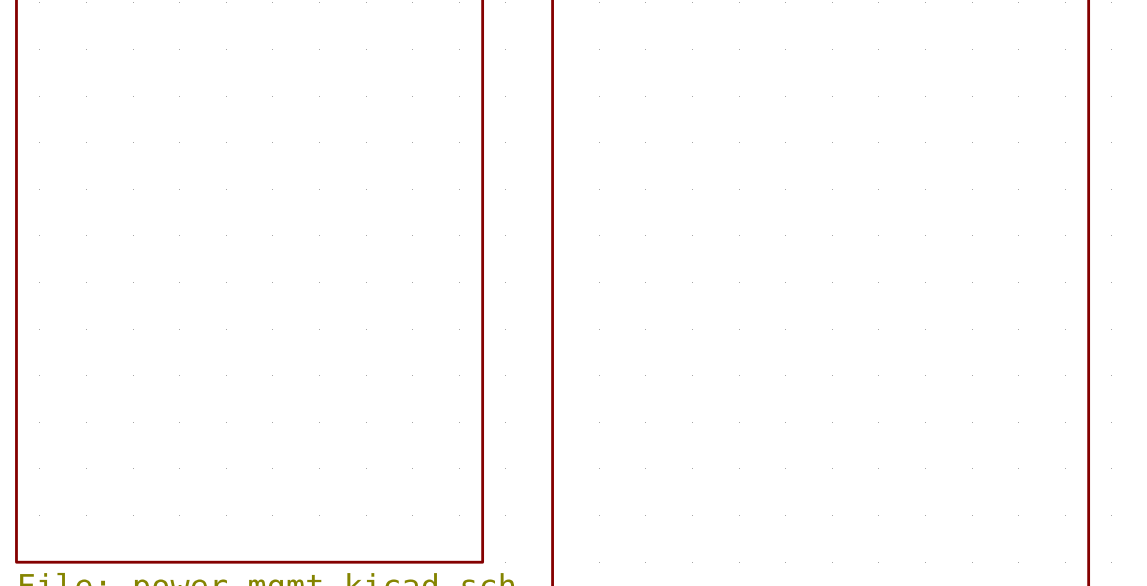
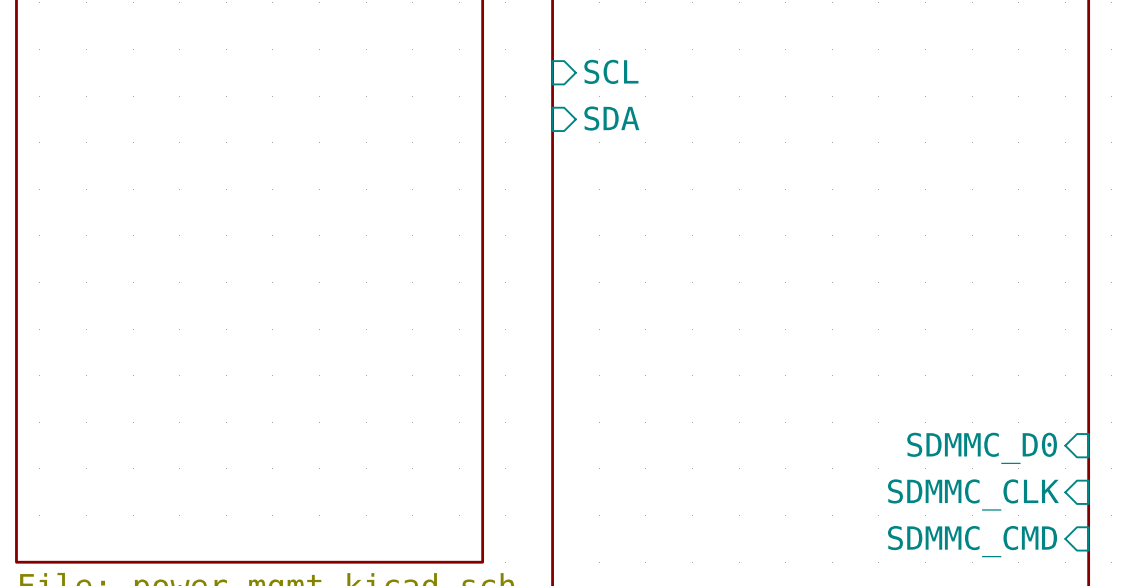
sheet pin: none -> SCL (611, 71)
sheet pin: none -> SDA (611, 118)
sheet pin: none -> SDMMC_D0 (982, 448)
sheet pin: none -> SDMMC_CLK (973, 494)
sheet pin: none -> SDMMC_CMD (972, 541)

